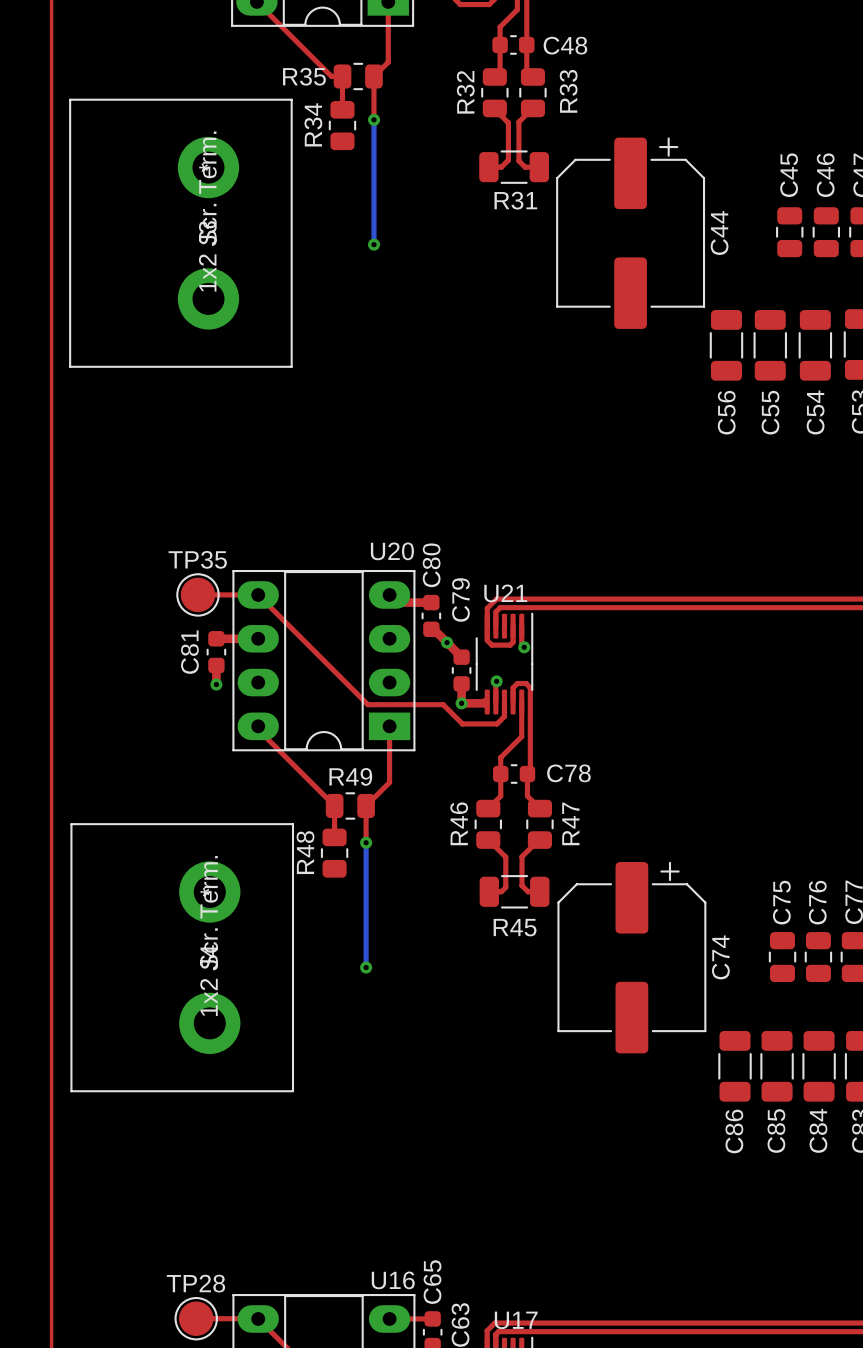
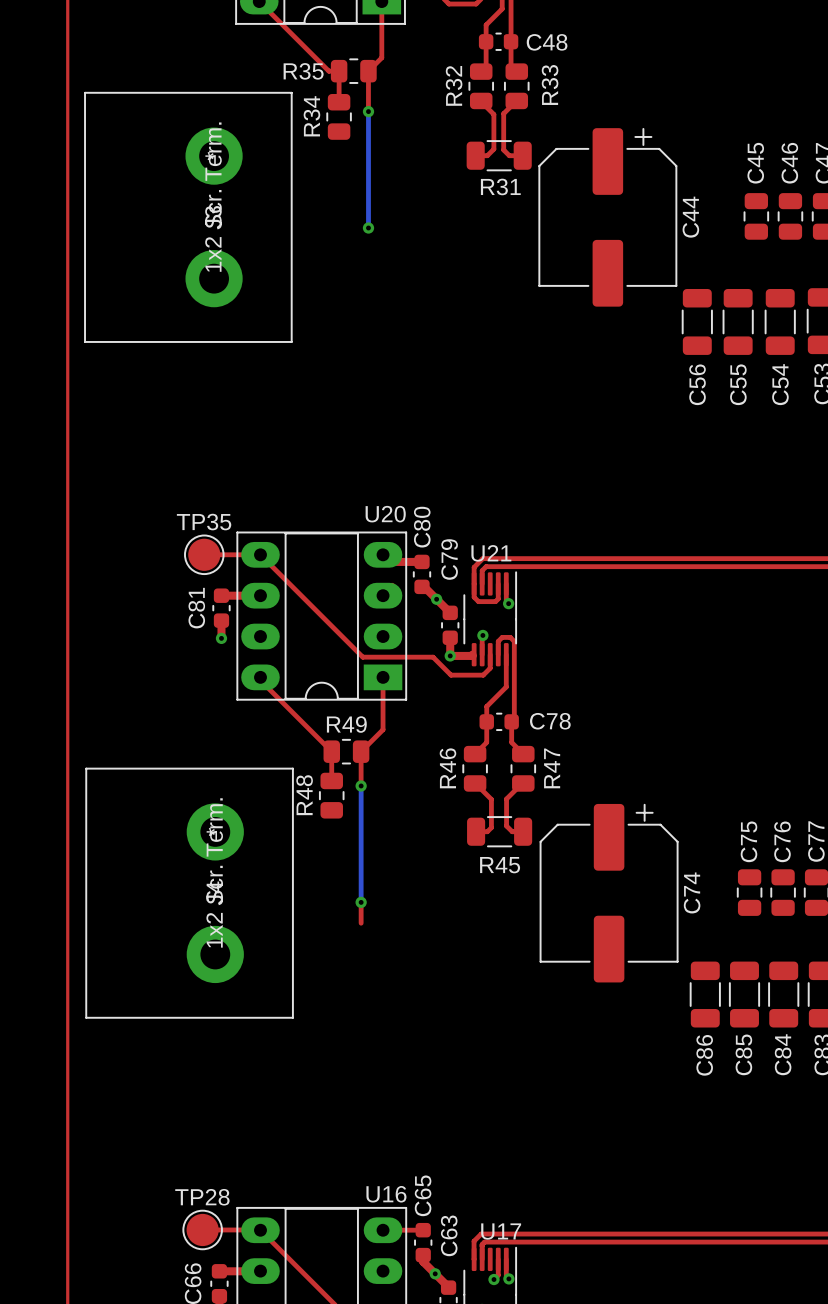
top track: none -> (361, 902) (361, 923)

